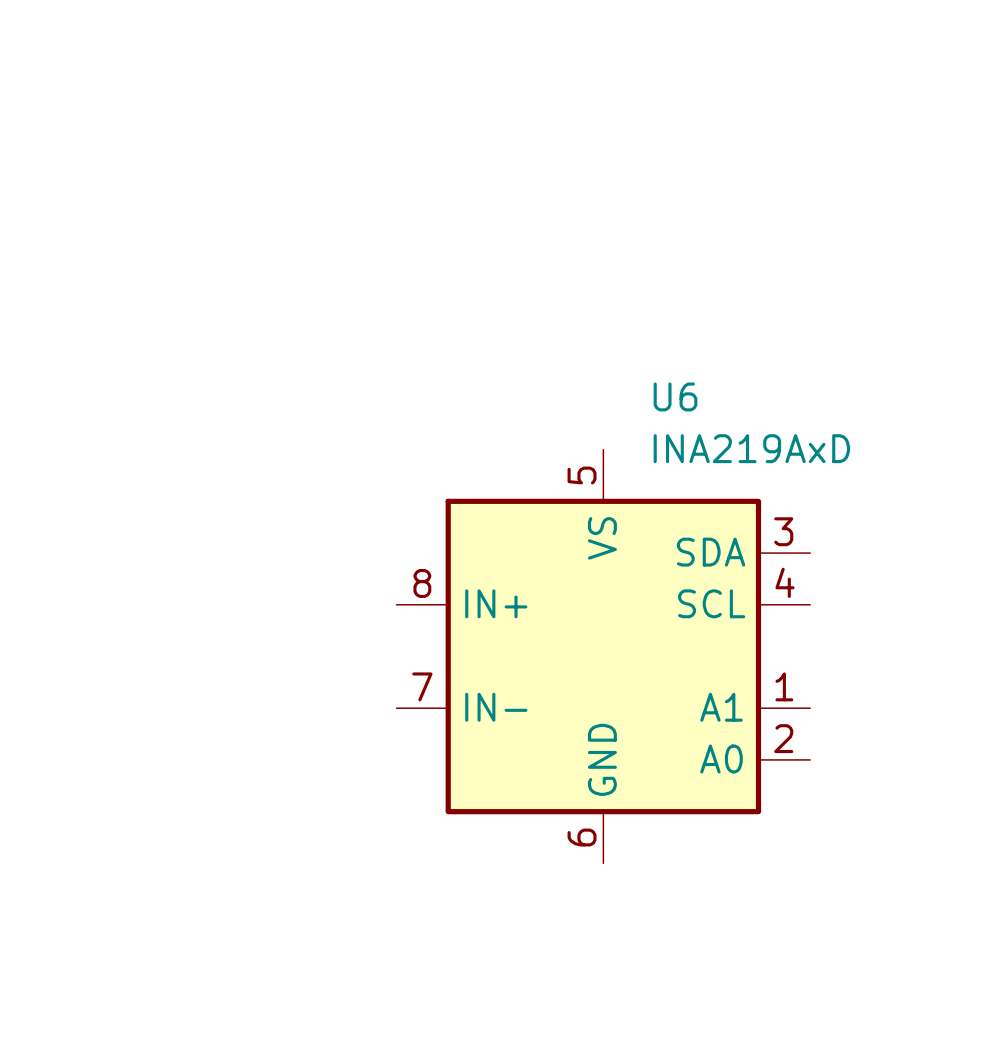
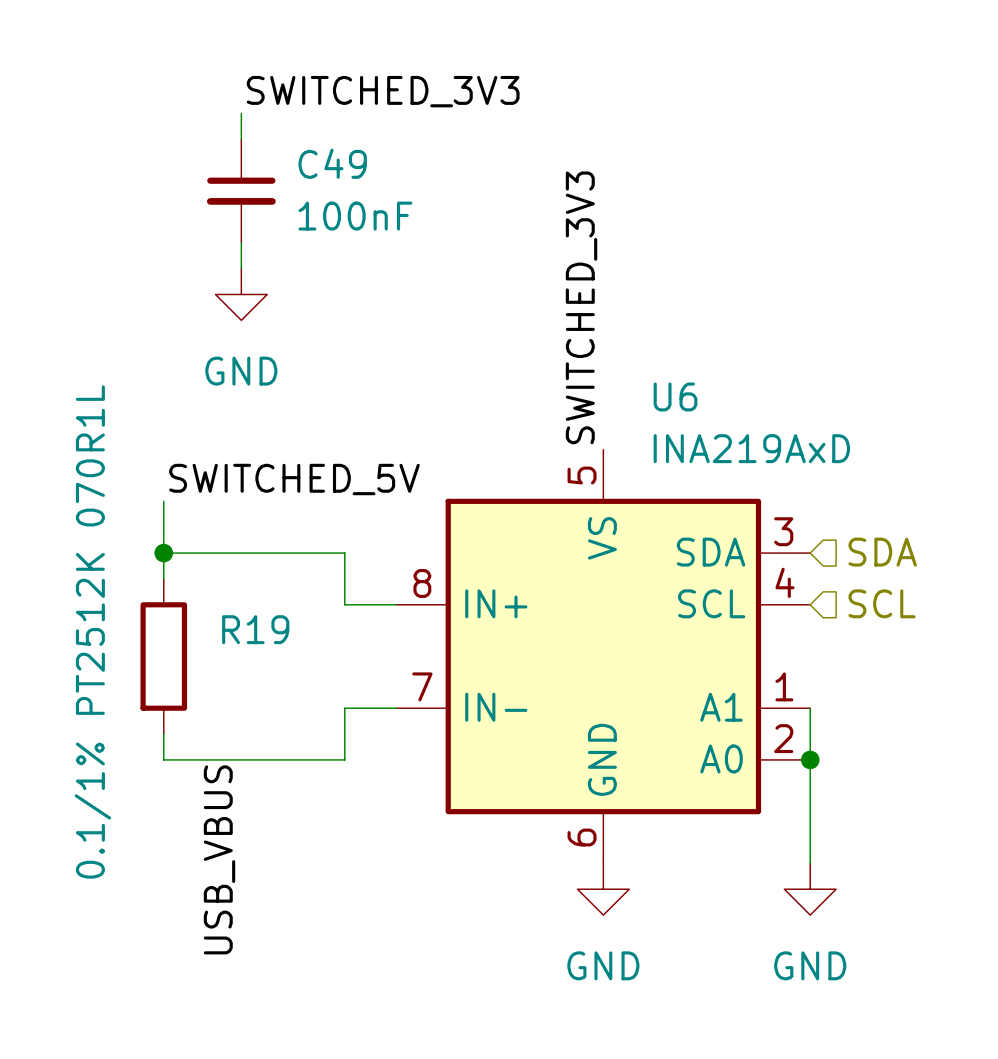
label: none -> SWITCHED_3V3 (383, 91)
wire: none -> (241, 113) (241, 139)
C49: none -> 100nF (241, 191)
wire: none -> (241, 242) (241, 268)
power symbol: none -> GND (241, 294)
label: none -> SWITCHED_3V3 (581, 307)
label: none -> SWITCHED_5V (294, 479)
wire: none -> (163, 501) (163, 578)
hierarchical label: none -> SDA (882, 552)
wire: none -> (163, 553) (344, 553) (344, 604) (396, 604)
junction: none -> (163, 553)
hierarchical label: none -> SCL (882, 603)
R19: none -> 0.1/1% PT2512K 070R1L (163, 656)
wire: none -> (396, 708) (344, 708) (344, 759) (163, 759) (163, 734)
wire: none -> (810, 708) (810, 863)
junction: none -> (810, 759)
label: none -> USB_VBUS (219, 859)
power symbol: none -> GND (603, 889)
power symbol: none -> GND (810, 889)

